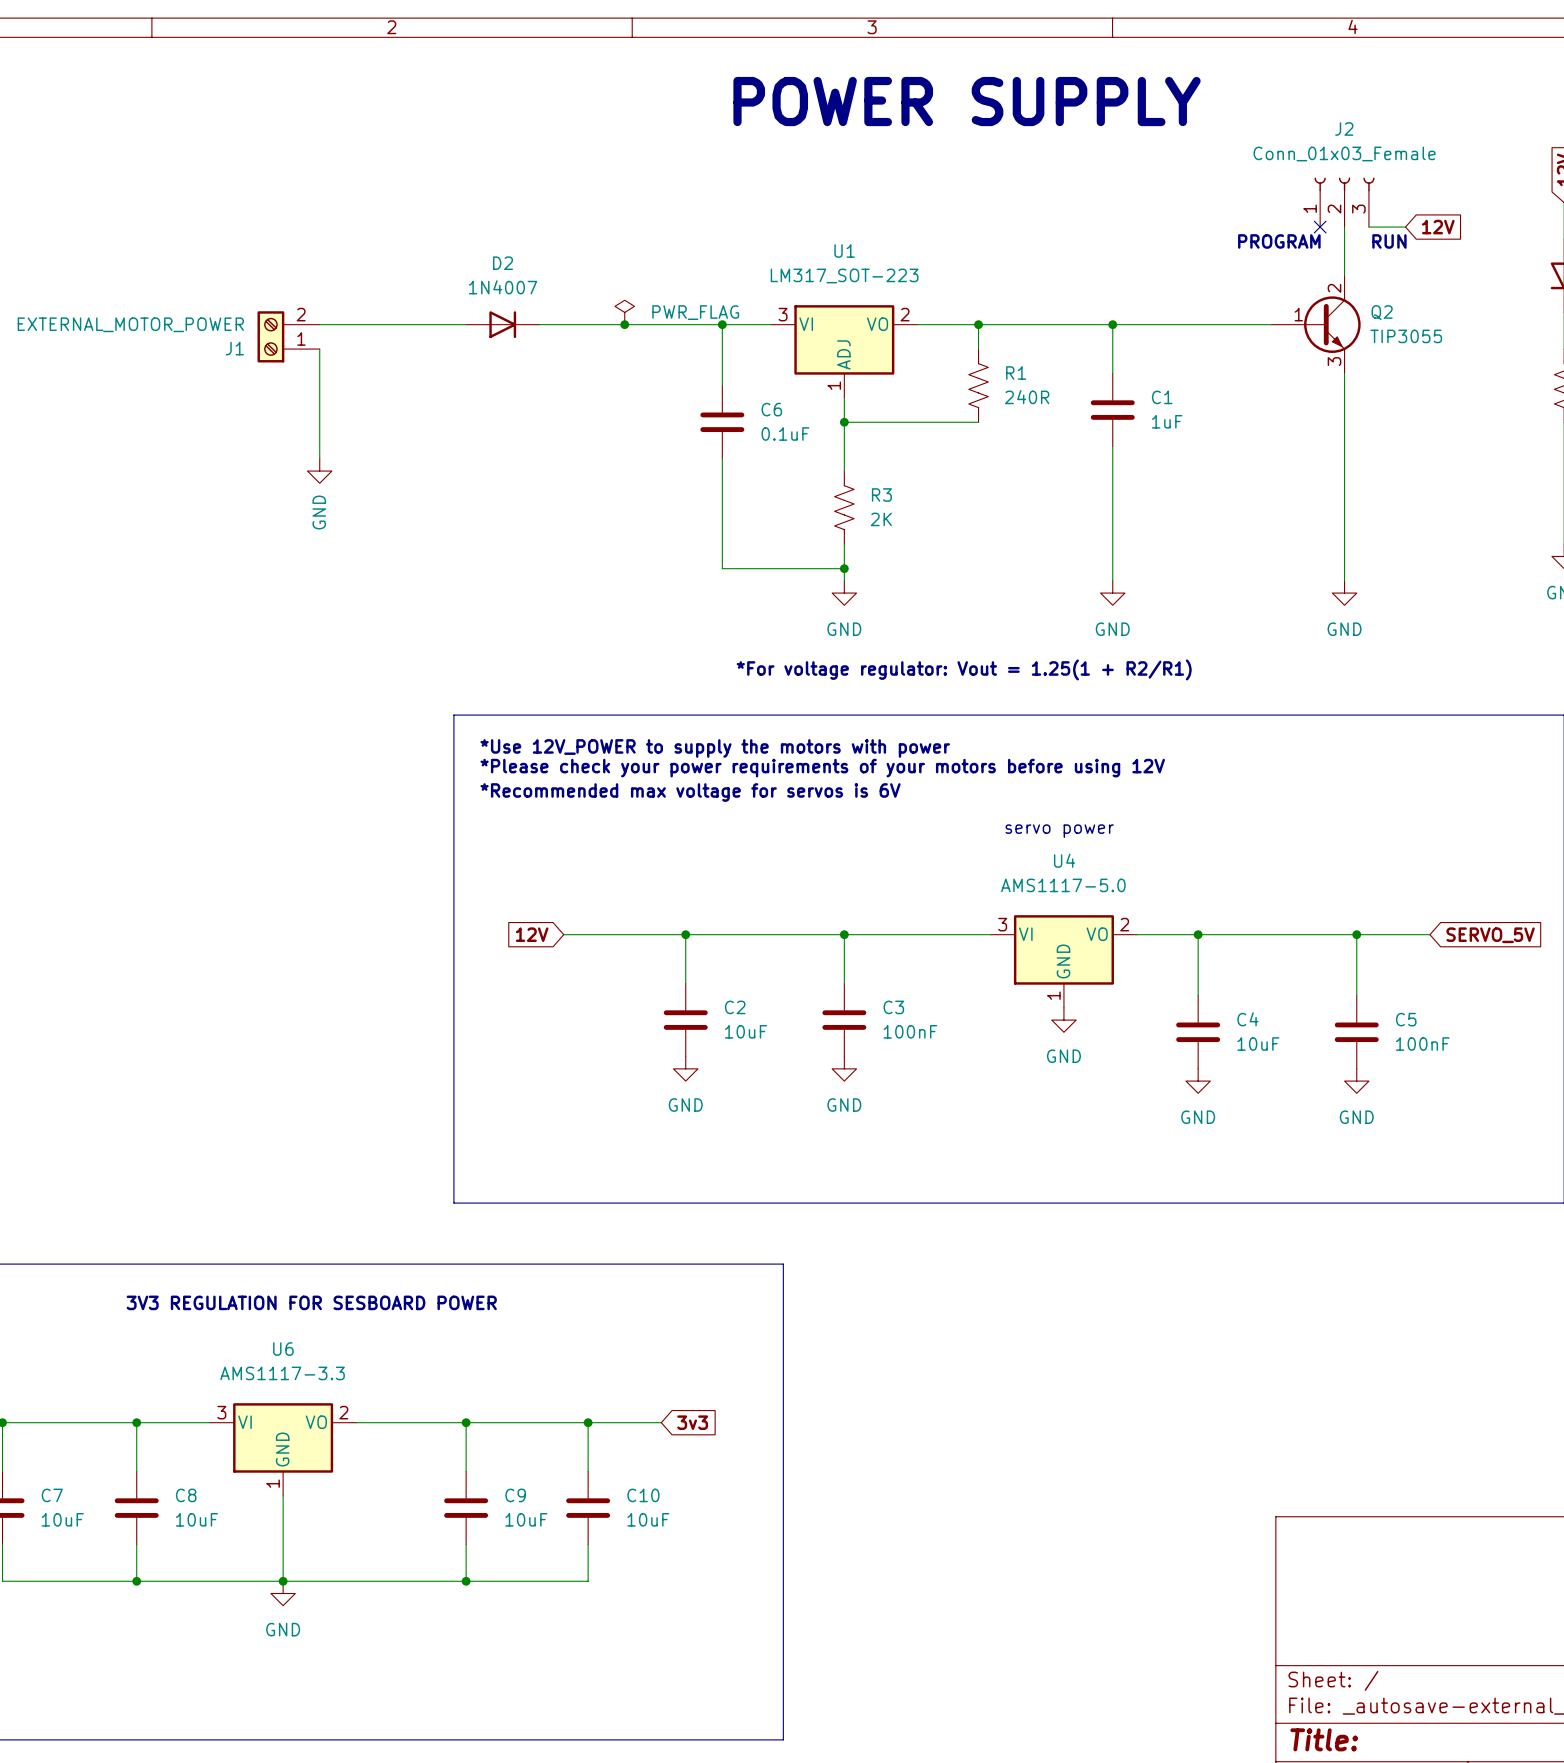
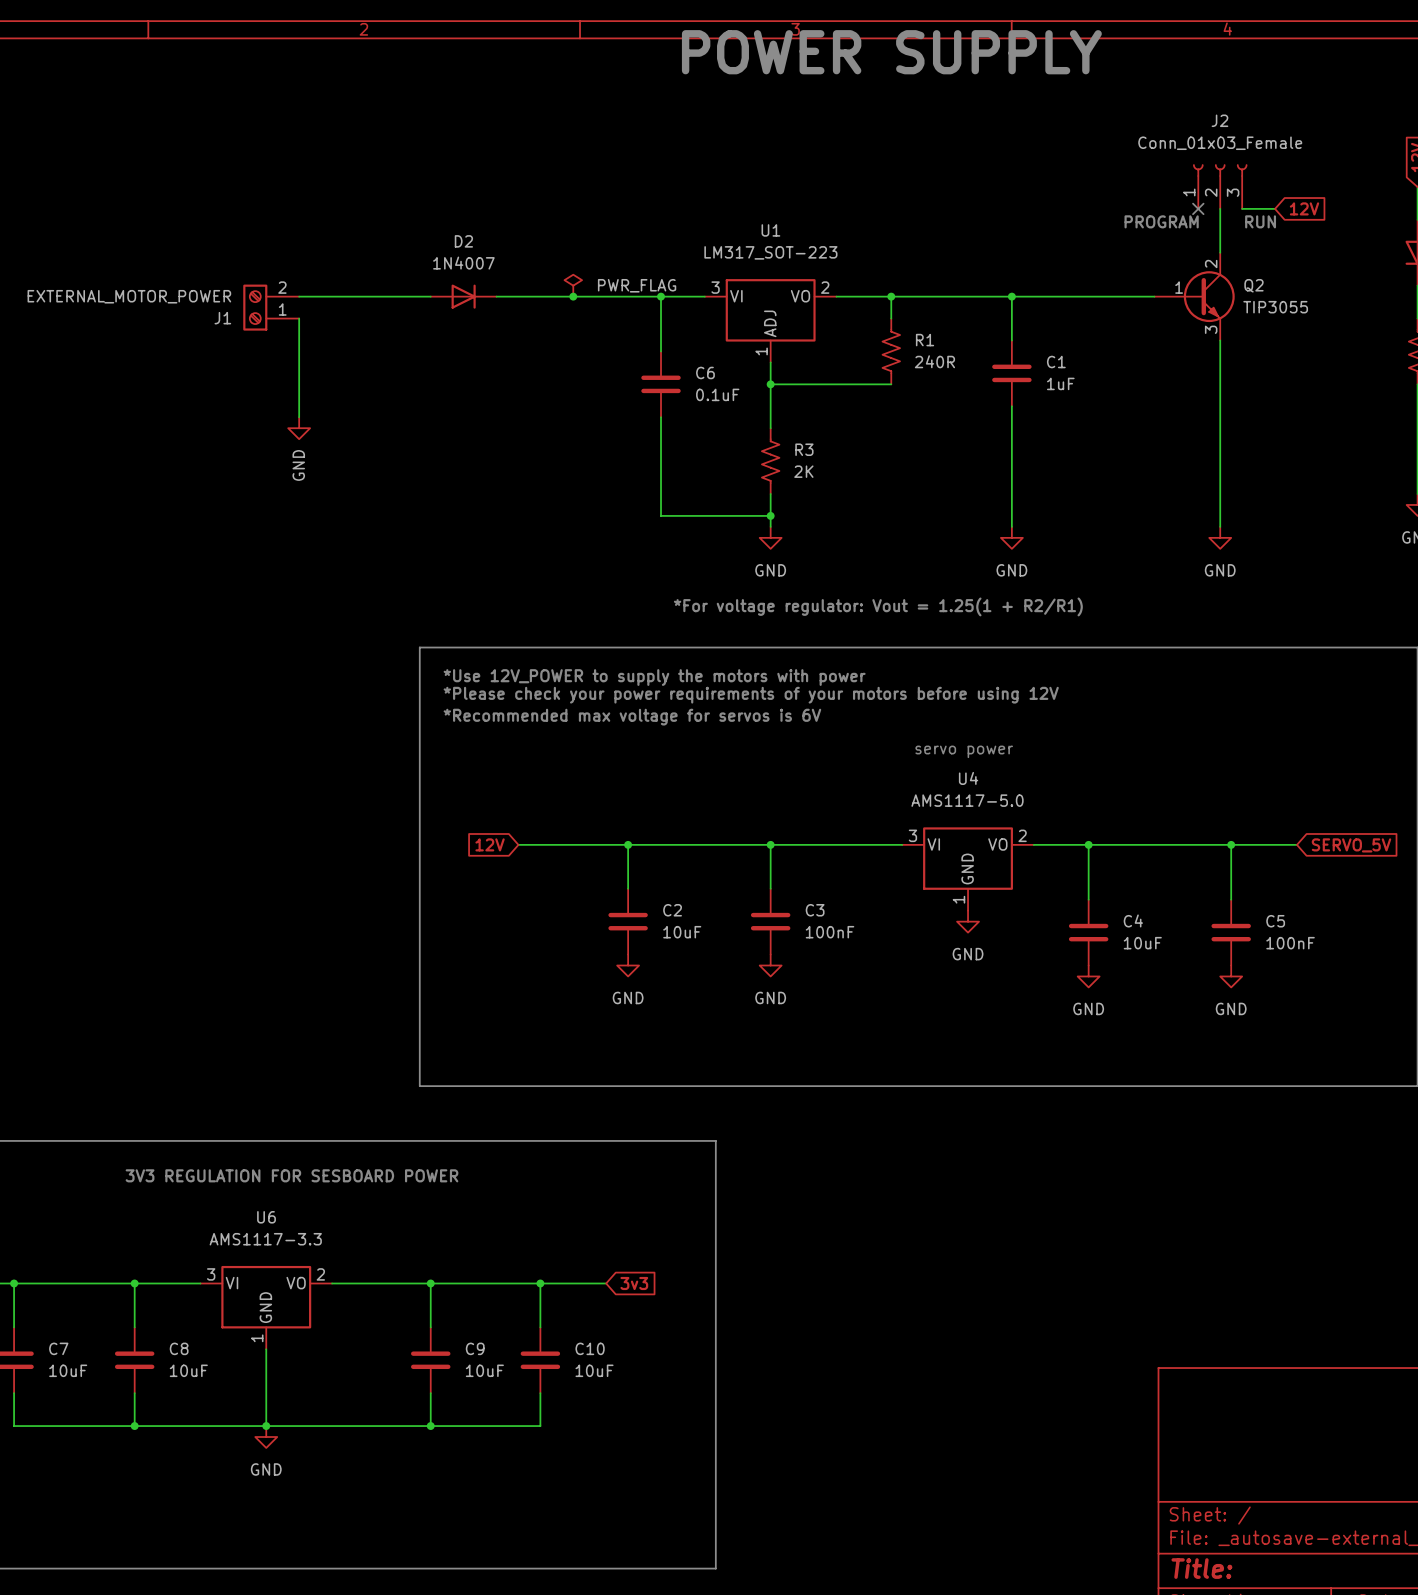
text position: POWER SUPPLY (967, 101) -> POWER SUPPLY (891, 52)

